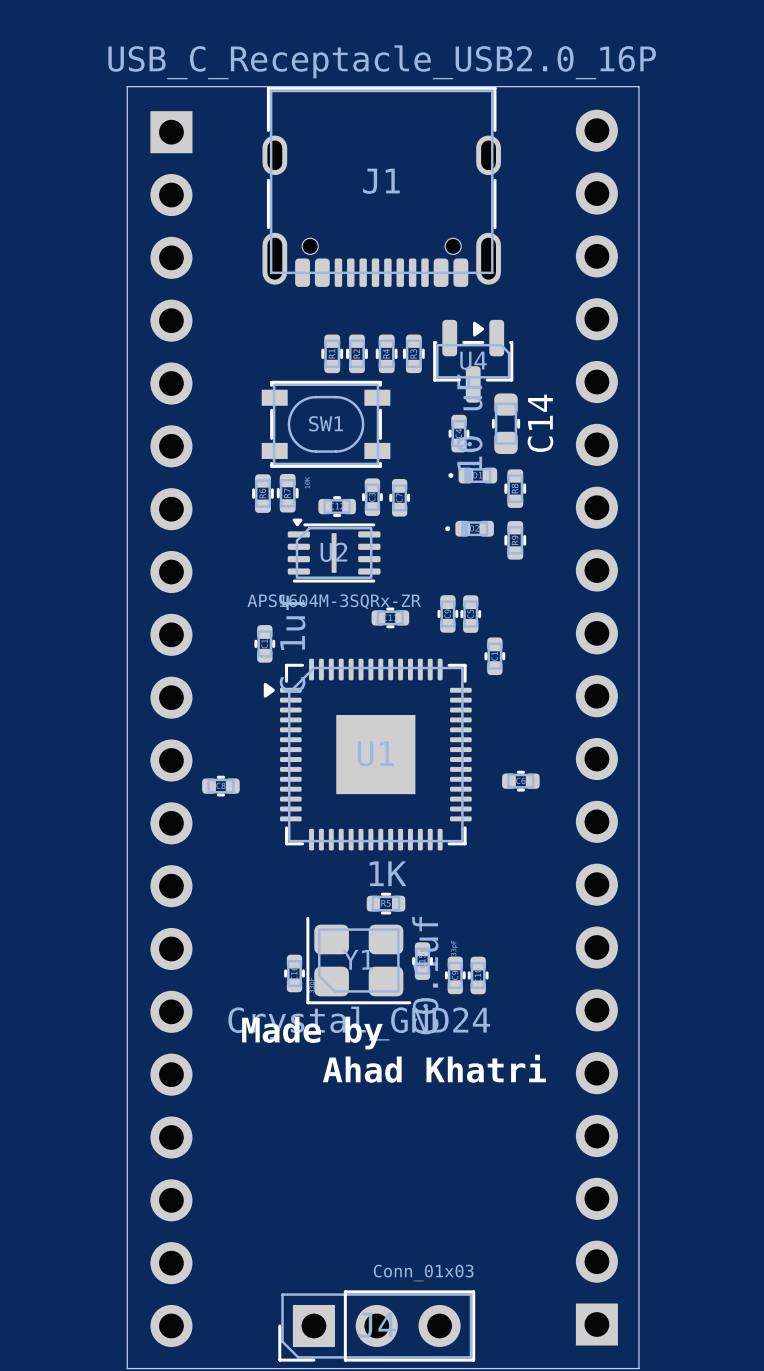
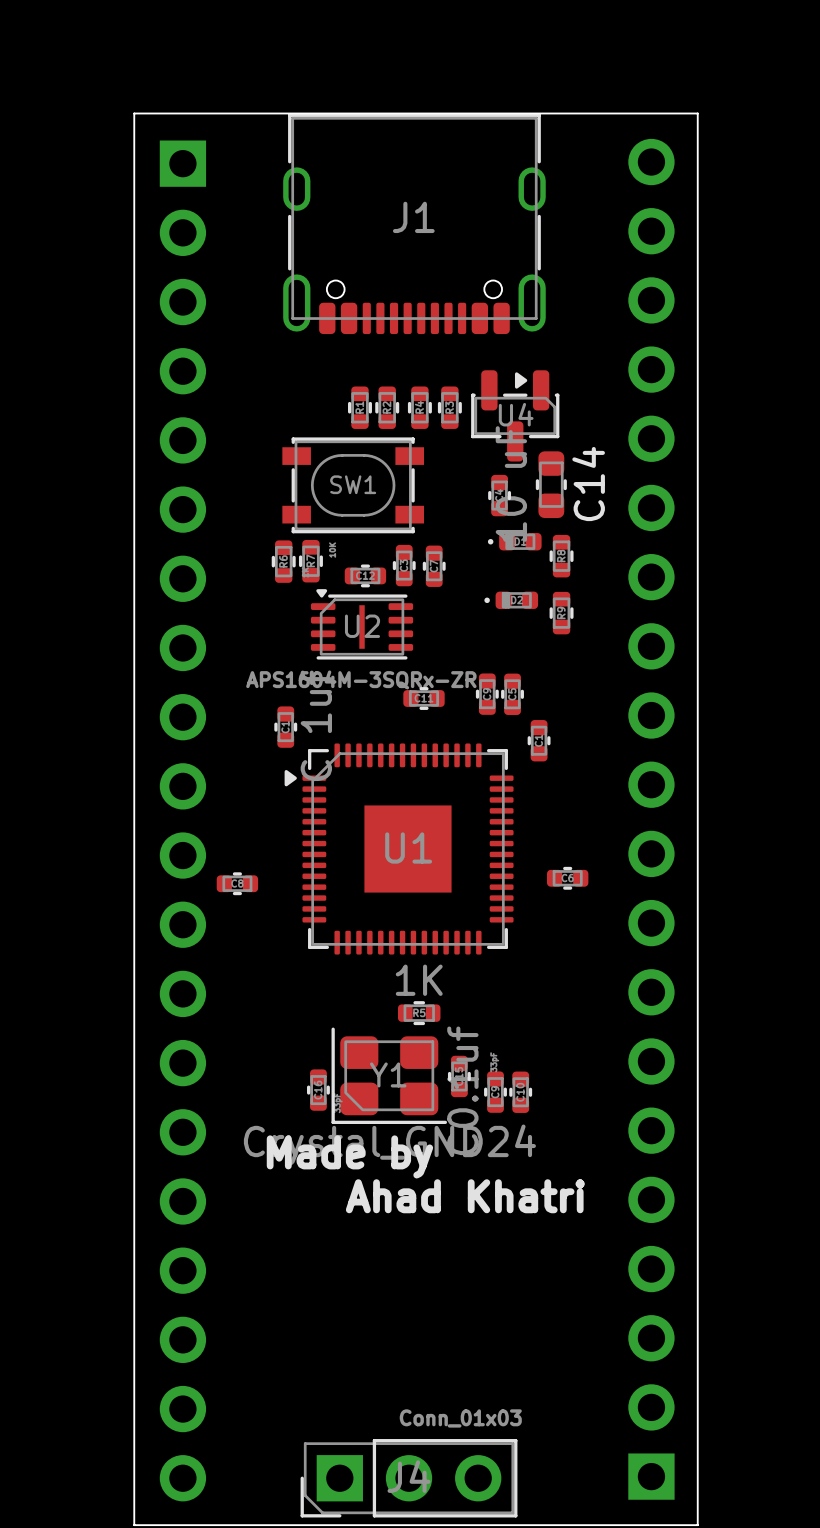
J1 value: USB_C_Receptacle_USB2.0_16P (382, 62) -> none

